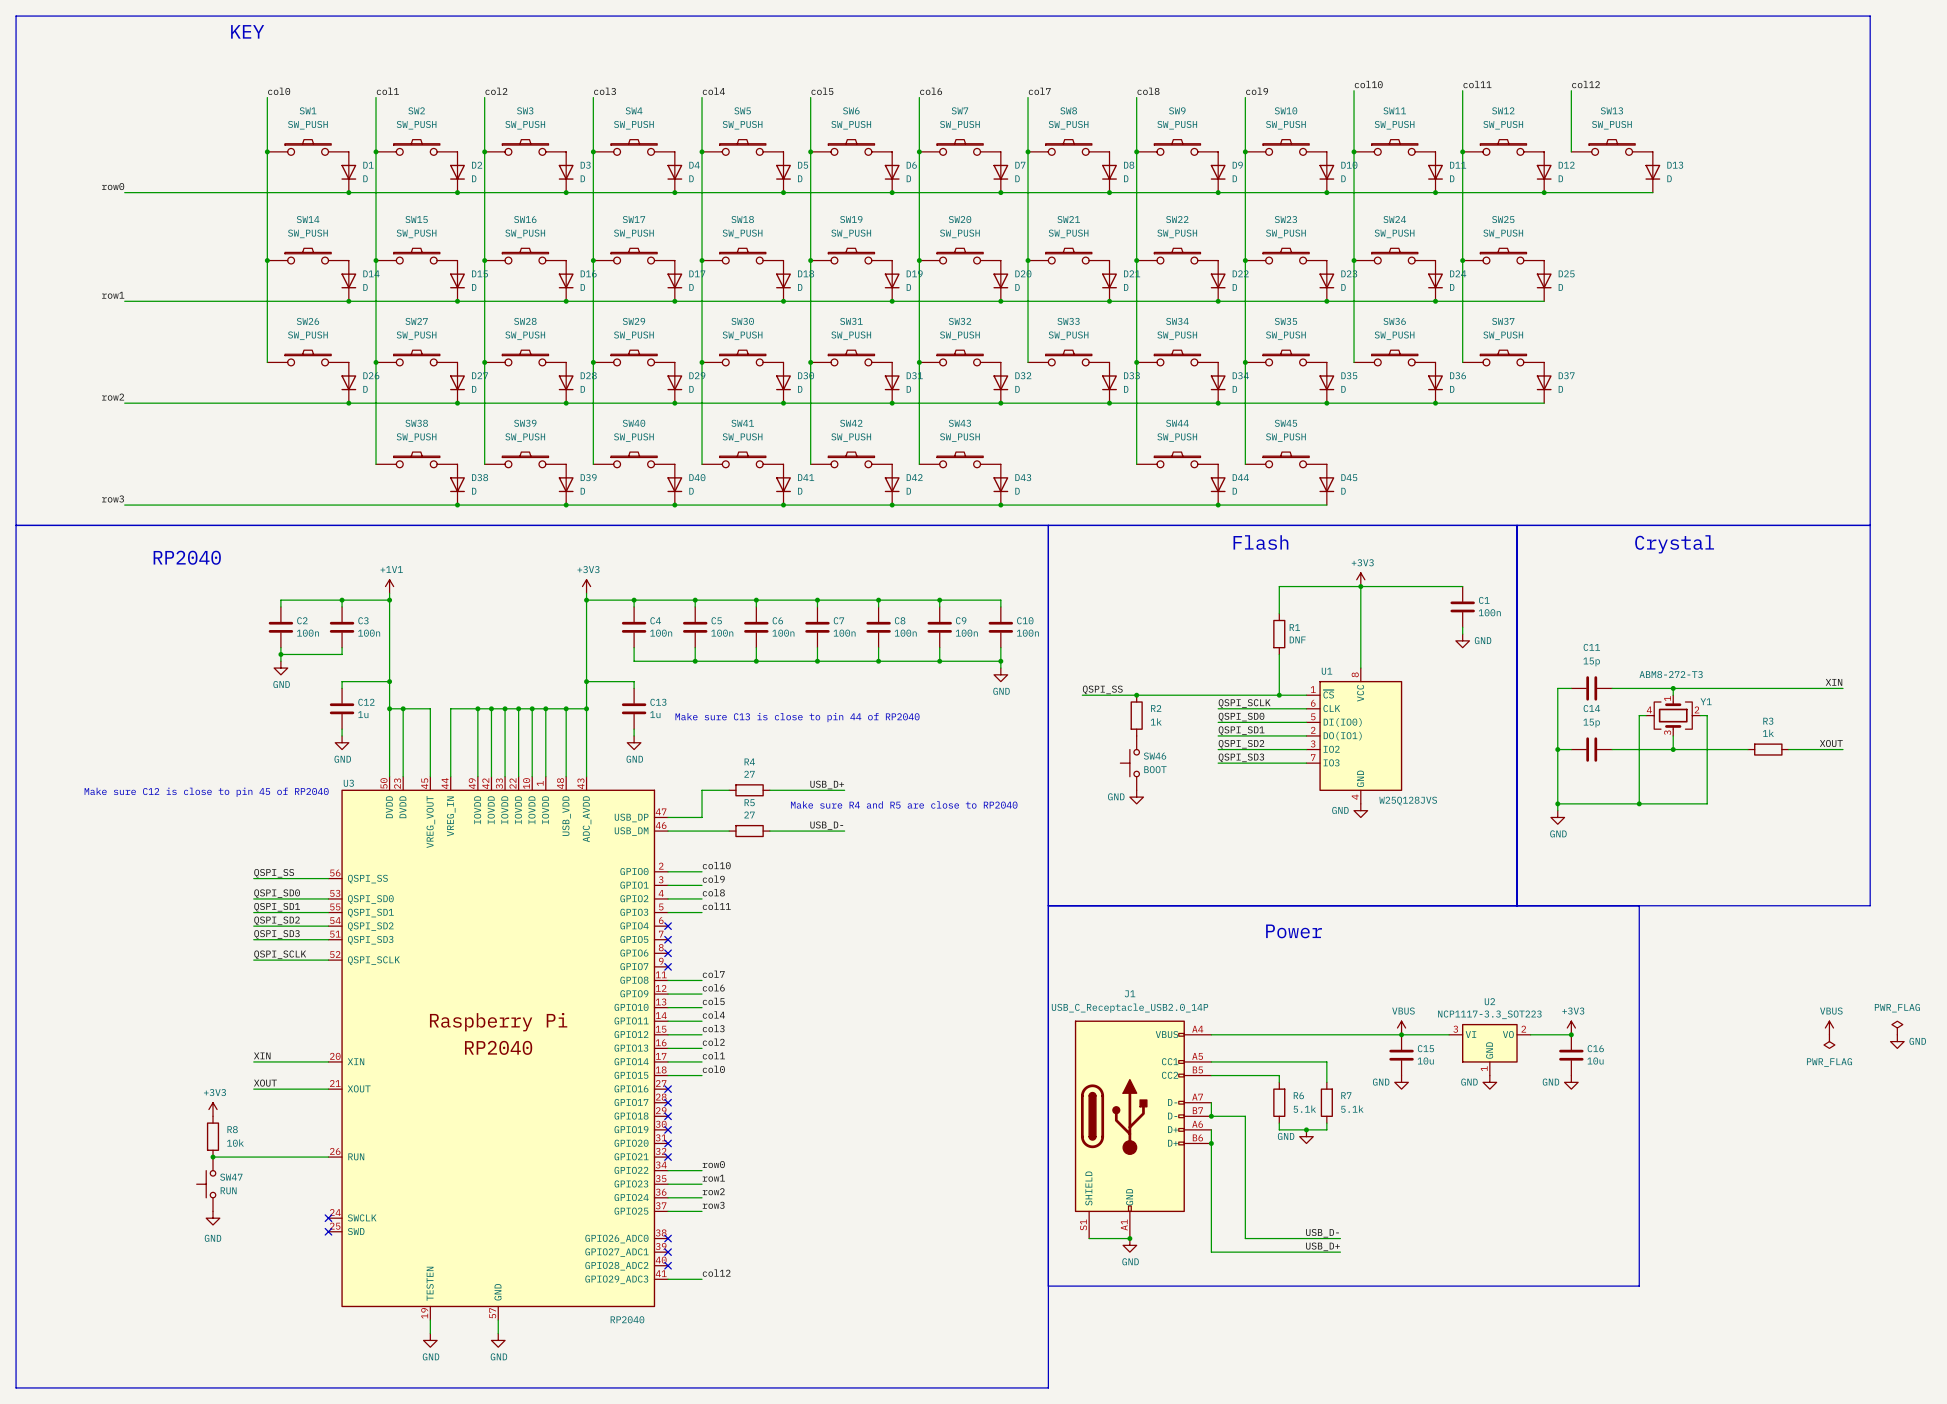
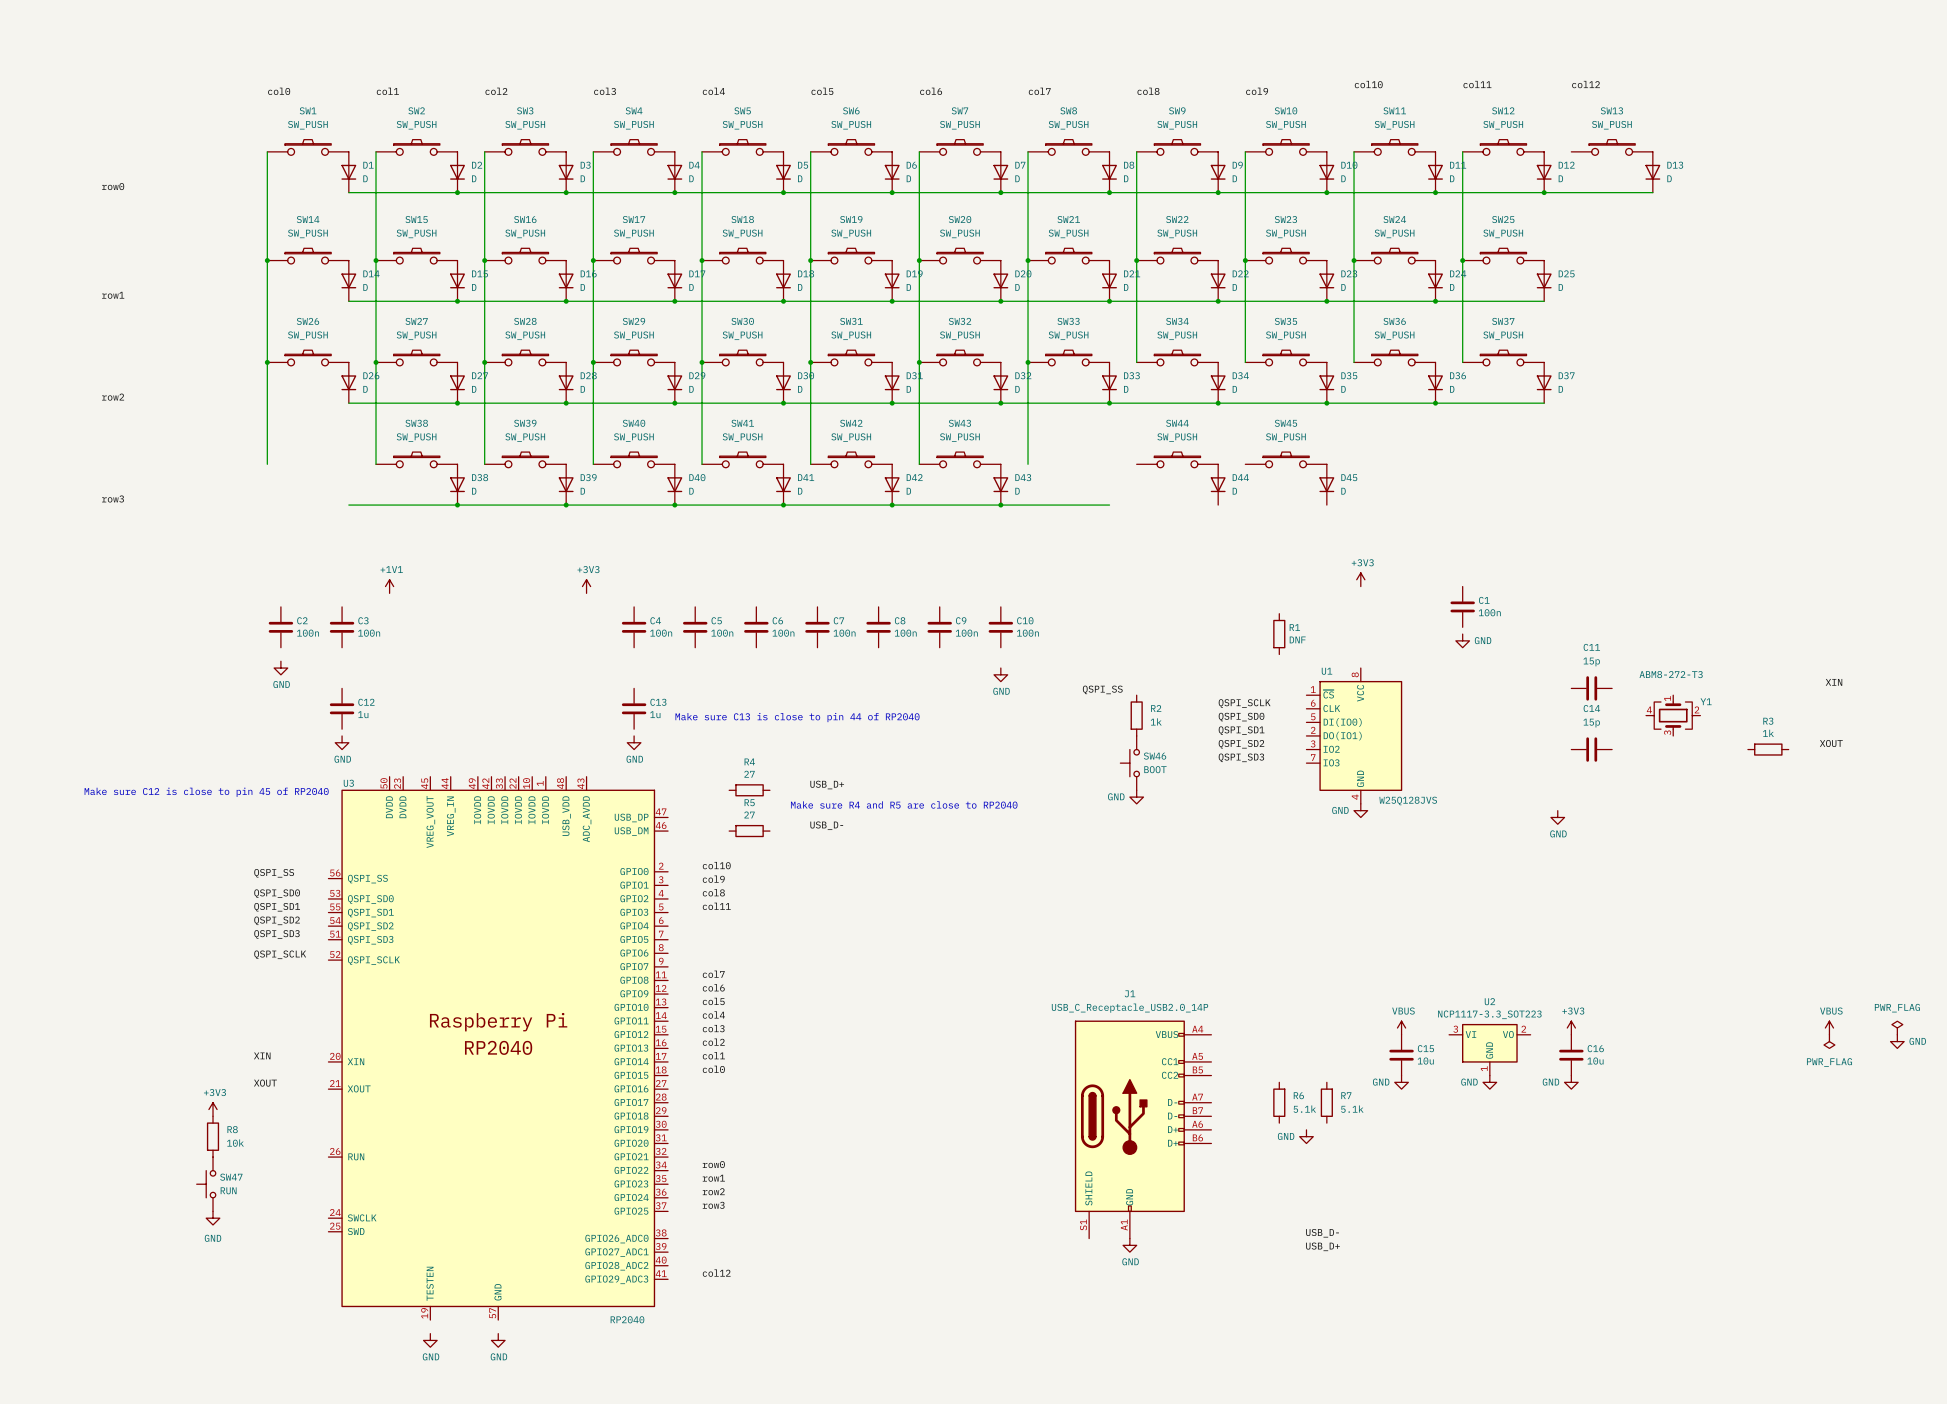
text: KEY (247, 31) -> none
wire: (1354, 90) (1354, 151) -> none
wire: (1462, 90) (1462, 151) -> none
wire: (1571, 90) (1571, 151) -> none
wire: (267, 97) (267, 151) -> none
wire: (376, 97) (376, 151) -> none
wire: (484, 97) (484, 151) -> none
wire: (593, 97) (593, 151) -> none
wire: (702, 97) (702, 151) -> none
wire: (810, 97) (810, 151) -> none
wire: (919, 97) (919, 151) -> none
wire: (1028, 97) (1028, 151) -> none
wire: (1136, 97) (1136, 151) -> none
wire: (1245, 97) (1245, 151) -> none
junction: (267, 151) -> none
junction: (376, 151) -> none
junction: (484, 151) -> none
junction: (593, 151) -> none
junction: (702, 151) -> none
junction: (810, 151) -> none
junction: (919, 151) -> none
junction: (1028, 151) -> none
junction: (1136, 151) -> none
junction: (1245, 151) -> none
junction: (1354, 151) -> none
junction: (1462, 151) -> none
wire: (124, 192) (348, 192) -> none
junction: (348, 192) -> none
wire: (124, 301) (348, 301) -> none
junction: (348, 301) -> none
wire: none -> (267, 362) (267, 464)
junction: none -> (267, 362)
junction: none -> (1028, 362)
wire: (1136, 362) (1136, 464) -> (1028, 362) (1028, 464)
junction: (1136, 362) -> none
wire: (1245, 362) (1245, 464) -> none
junction: (1245, 362) -> none
wire: (124, 403) (348, 403) -> none
junction: (348, 403) -> none
wire: (124, 505) (348, 505) -> none
wire: (1109, 505) (1326, 505) -> none
junction: (1218, 505) -> none
line: (16, 525) (1870, 525) -> none
line: (1048, 525) (1048, 1387) (16, 1387) (16, 16) (1870, 16) (1870, 905) (1048, 905) -> none
line: (1517, 525) (1517, 905) -> none
text: Flash (1260, 542) -> none
text: Crystal (1674, 544) -> none
text: RP2040 (187, 557) -> none
wire: (1360, 586) (1360, 668) -> none
junction: (1360, 586) -> none
wire: (1462, 586) (1279, 586) (1279, 613) -> none
wire: (389, 593) (389, 776) -> none
wire: (586, 593) (586, 776) -> none
wire: (342, 600) (342, 606) -> none
junction: (342, 600) -> none
wire: (389, 600) (280, 600) (280, 606) -> none
junction: (389, 600) -> none
wire: (586, 600) (1000, 600) (1000, 606) -> none
junction: (586, 600) -> none
wire: (634, 600) (634, 606) -> none
junction: (634, 600) -> none
wire: (695, 600) (695, 606) -> none
junction: (695, 600) -> none
wire: (756, 600) (756, 606) -> none
junction: (756, 600) -> none
wire: (817, 600) (817, 606) -> none
junction: (817, 600) -> none
wire: (878, 600) (878, 606) -> none
junction: (878, 600) -> none
wire: (939, 600) (939, 606) -> none
junction: (939, 600) -> none
wire: (1462, 627) (1462, 634) -> none
wire: (280, 647) (280, 661) -> none
wire: (342, 647) (342, 654) (280, 654) -> none
wire: (634, 647) (634, 661) (1000, 661) -> none
wire: (695, 647) (695, 661) -> none
wire: (756, 647) (756, 661) -> none
wire: (817, 647) (817, 661) -> none
wire: (878, 647) (878, 661) -> none
wire: (939, 647) (939, 661) -> none
wire: (1000, 647) (1000, 668) -> none
junction: (280, 654) -> none
wire: (1279, 654) (1279, 695) -> none
junction: (695, 661) -> none
junction: (756, 661) -> none
junction: (817, 661) -> none
junction: (878, 661) -> none
junction: (939, 661) -> none
junction: (1000, 661) -> none
wire: (389, 681) (342, 681) (342, 688) -> none
junction: (389, 681) -> none
wire: (586, 681) (634, 681) (634, 688) -> none
junction: (586, 681) -> none
wire: (1571, 688) (1557, 688) (1557, 810) -> none
wire: (1612, 688) (1843, 688) -> none
wire: (1673, 688) (1673, 695) -> none
junction: (1673, 688) -> none
wire: (1082, 695) (1306, 695) -> none
junction: (1136, 695) -> none
junction: (1279, 695) -> none
wire: (389, 708) (430, 708) (430, 776) -> none
junction: (389, 708) -> none
wire: (403, 708) (403, 776) -> none
junction: (403, 708) -> none
wire: (477, 708) (477, 776) -> none
junction: (477, 708) -> none
wire: (491, 708) (491, 776) -> none
junction: (491, 708) -> none
wire: (505, 708) (505, 776) -> none
junction: (505, 708) -> none
wire: (518, 708) (518, 776) -> none
junction: (518, 708) -> none
wire: (532, 708) (532, 776) -> none
junction: (532, 708) -> none
wire: (545, 708) (545, 776) -> none
junction: (545, 708) -> none
wire: (566, 708) (566, 776) -> none
junction: (566, 708) -> none
wire: (586, 708) (450, 708) (450, 776) -> none
junction: (586, 708) -> none
wire: (1218, 708) (1306, 708) -> none
wire: (1646, 715) (1639, 715) (1639, 803) -> none
wire: (1700, 715) (1707, 715) (1707, 803) (1557, 803) -> none
wire: (1218, 722) (1306, 722) -> none
wire: (342, 729) (342, 735) -> none
wire: (634, 729) (634, 735) -> none
wire: (1218, 735) (1306, 735) -> none
wire: (1673, 735) (1673, 749) -> none
wire: (1218, 749) (1306, 749) -> none
wire: (1557, 749) (1571, 749) -> none
junction: (1557, 749) -> none
wire: (1612, 749) (1747, 749) -> none
junction: (1673, 749) -> none
wire: (1788, 749) (1843, 749) -> none
wire: (1218, 763) (1306, 763) -> none
wire: (729, 790) (702, 790) (702, 817) (668, 817) -> none
wire: (769, 790) (844, 790) -> none
junction: (1557, 803) -> none
junction: (1639, 803) -> none
wire: (668, 831) (729, 831) -> none
wire: (769, 831) (844, 831) -> none
wire: (668, 871) (702, 871) -> none
wire: (253, 878) (328, 878) -> none
wire: (668, 885) (702, 885) -> none
wire: (253, 898) (328, 898) -> none
wire: (668, 898) (702, 898) -> none
line: (1639, 905) (1639, 1286) (1048, 1286) -> none
wire: (253, 912) (328, 912) -> none
wire: (668, 912) (702, 912) -> none
wire: (253, 926) (328, 926) -> none
no-connect mark: (668, 926) -> none
text: Power (1294, 931) -> none
wire: (253, 939) (328, 939) -> none
no-connect mark: (668, 939) -> none
no-connect mark: (668, 953) -> none
wire: (253, 960) (328, 960) -> none
no-connect mark: (668, 966) -> none
wire: (668, 980) (702, 980) -> none
wire: (668, 994) (702, 994) -> none
wire: (668, 1007) (702, 1007) -> none
wire: (668, 1021) (702, 1021) -> none
wire: (668, 1034) (702, 1034) -> none
wire: (1211, 1034) (1449, 1034) -> none
junction: (1401, 1034) -> none
wire: (1530, 1034) (1571, 1034) -> none
junction: (1571, 1034) -> none
wire: (668, 1048) (702, 1048) -> none
wire: (253, 1061) (328, 1061) -> none
wire: (668, 1061) (702, 1061) -> none
wire: (1211, 1061) (1326, 1061) (1326, 1082) -> none
wire: (668, 1075) (702, 1075) -> none
wire: (1211, 1075) (1279, 1075) (1279, 1082) -> none
wire: (253, 1089) (328, 1089) -> none
no-connect mark: (668, 1089) -> none
no-connect mark: (668, 1102) -> none
wire: (1211, 1102) (1211, 1116) (1245, 1116) (1245, 1238) (1340, 1238) -> none
no-connect mark: (668, 1116) -> none
junction: (1211, 1116) -> none
wire: (1279, 1123) (1279, 1129) (1326, 1129) (1326, 1123) -> none
no-connect mark: (668, 1129) -> none
wire: (1211, 1129) (1211, 1252) (1340, 1252) -> none
junction: (1306, 1129) -> none
no-connect mark: (668, 1143) -> none
junction: (1211, 1143) -> none
wire: (213, 1157) (328, 1157) -> none
junction: (213, 1157) -> none
no-connect mark: (668, 1157) -> none
wire: (668, 1170) (702, 1170) -> none
wire: (668, 1184) (702, 1184) -> none
wire: (668, 1197) (702, 1197) -> none
wire: (668, 1211) (702, 1211) -> none
no-connect mark: (328, 1218) -> none
no-connect mark: (328, 1231) -> none
no-connect mark: (668, 1238) -> none
wire: (1089, 1238) (1129, 1238) -> none
junction: (1129, 1238) -> none
no-connect mark: (668, 1252) -> none
no-connect mark: (668, 1265) -> none
wire: (668, 1279) (702, 1279) -> none
wire: (430, 1320) (430, 1333) -> none
wire: (498, 1320) (498, 1333) -> none

